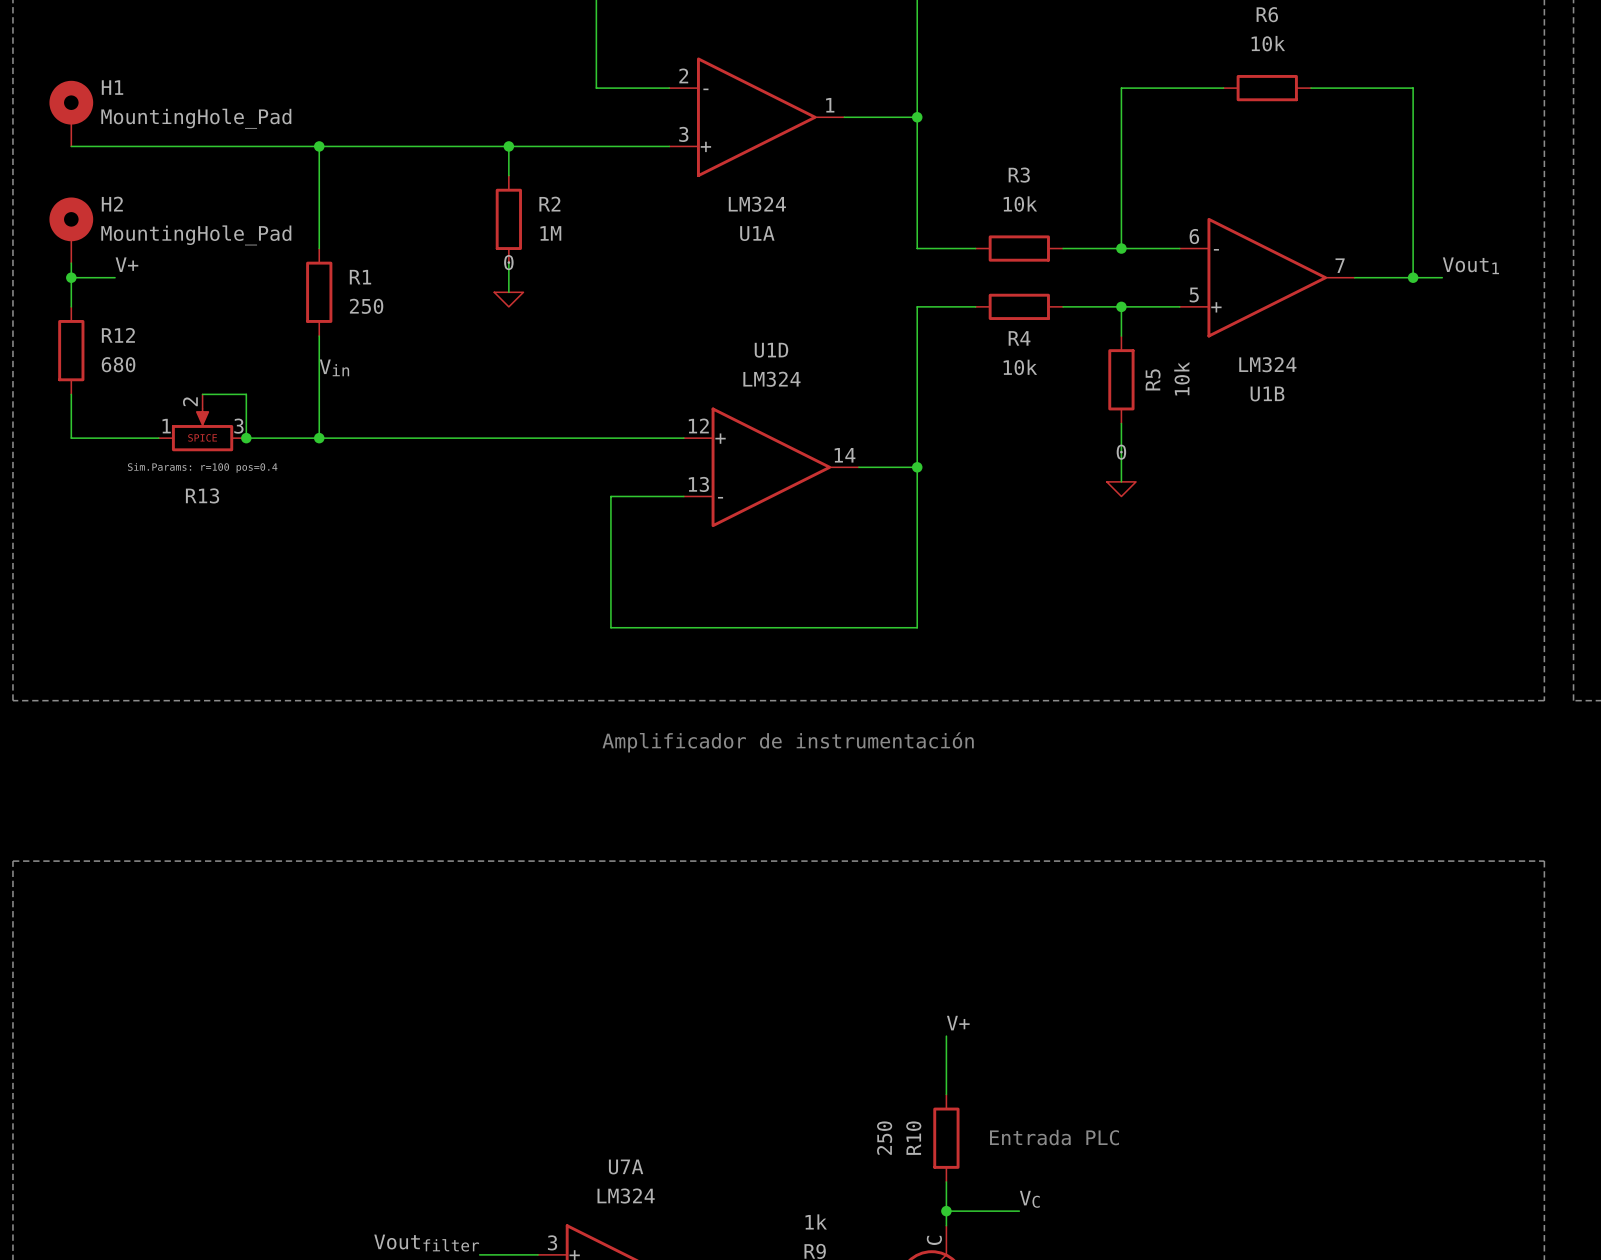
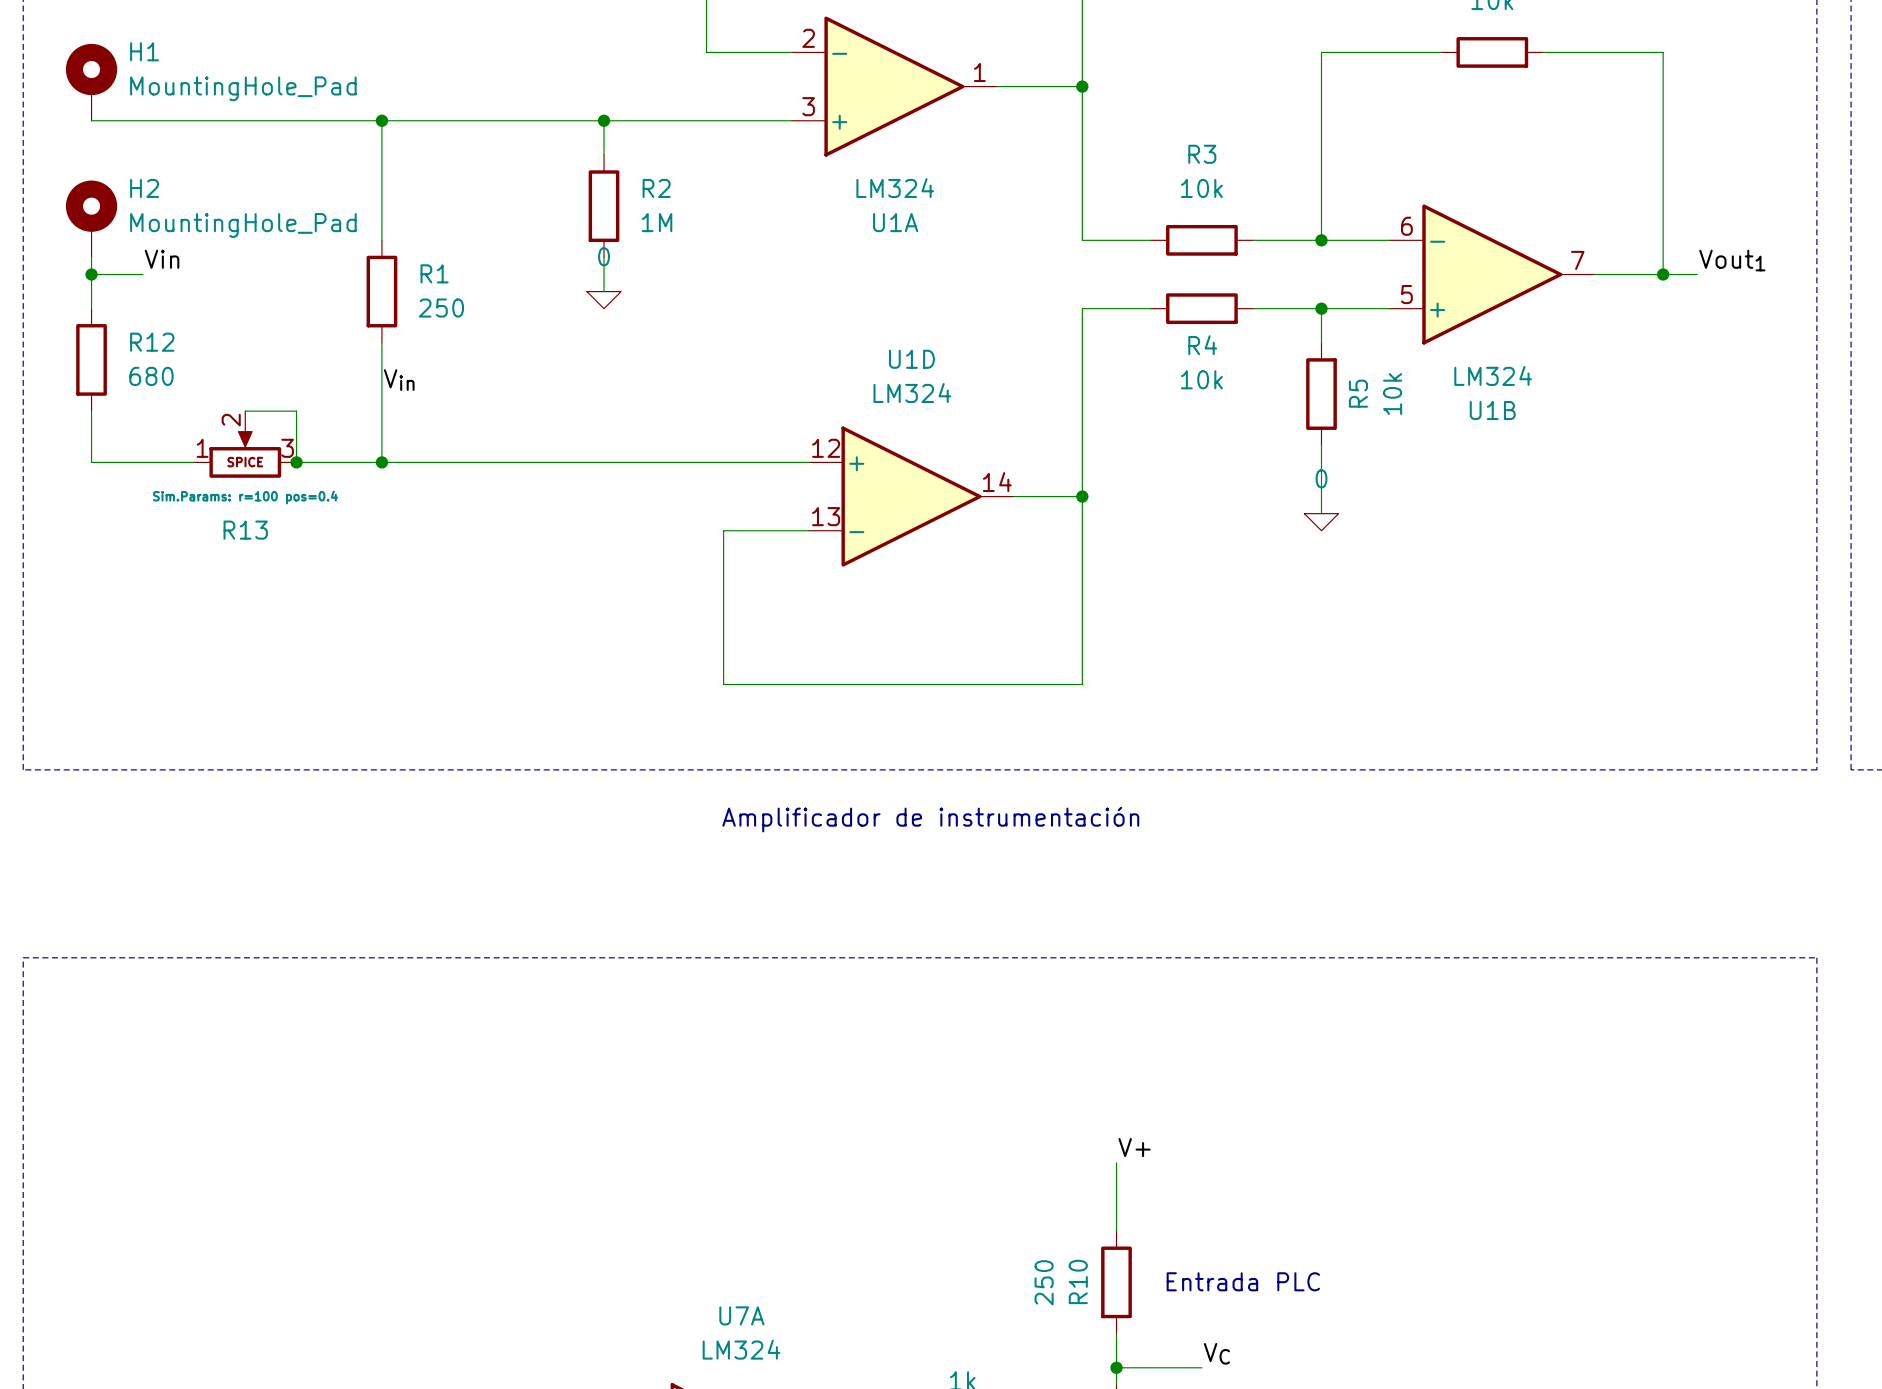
label: V+ (126, 264) -> Vin (162, 259)

